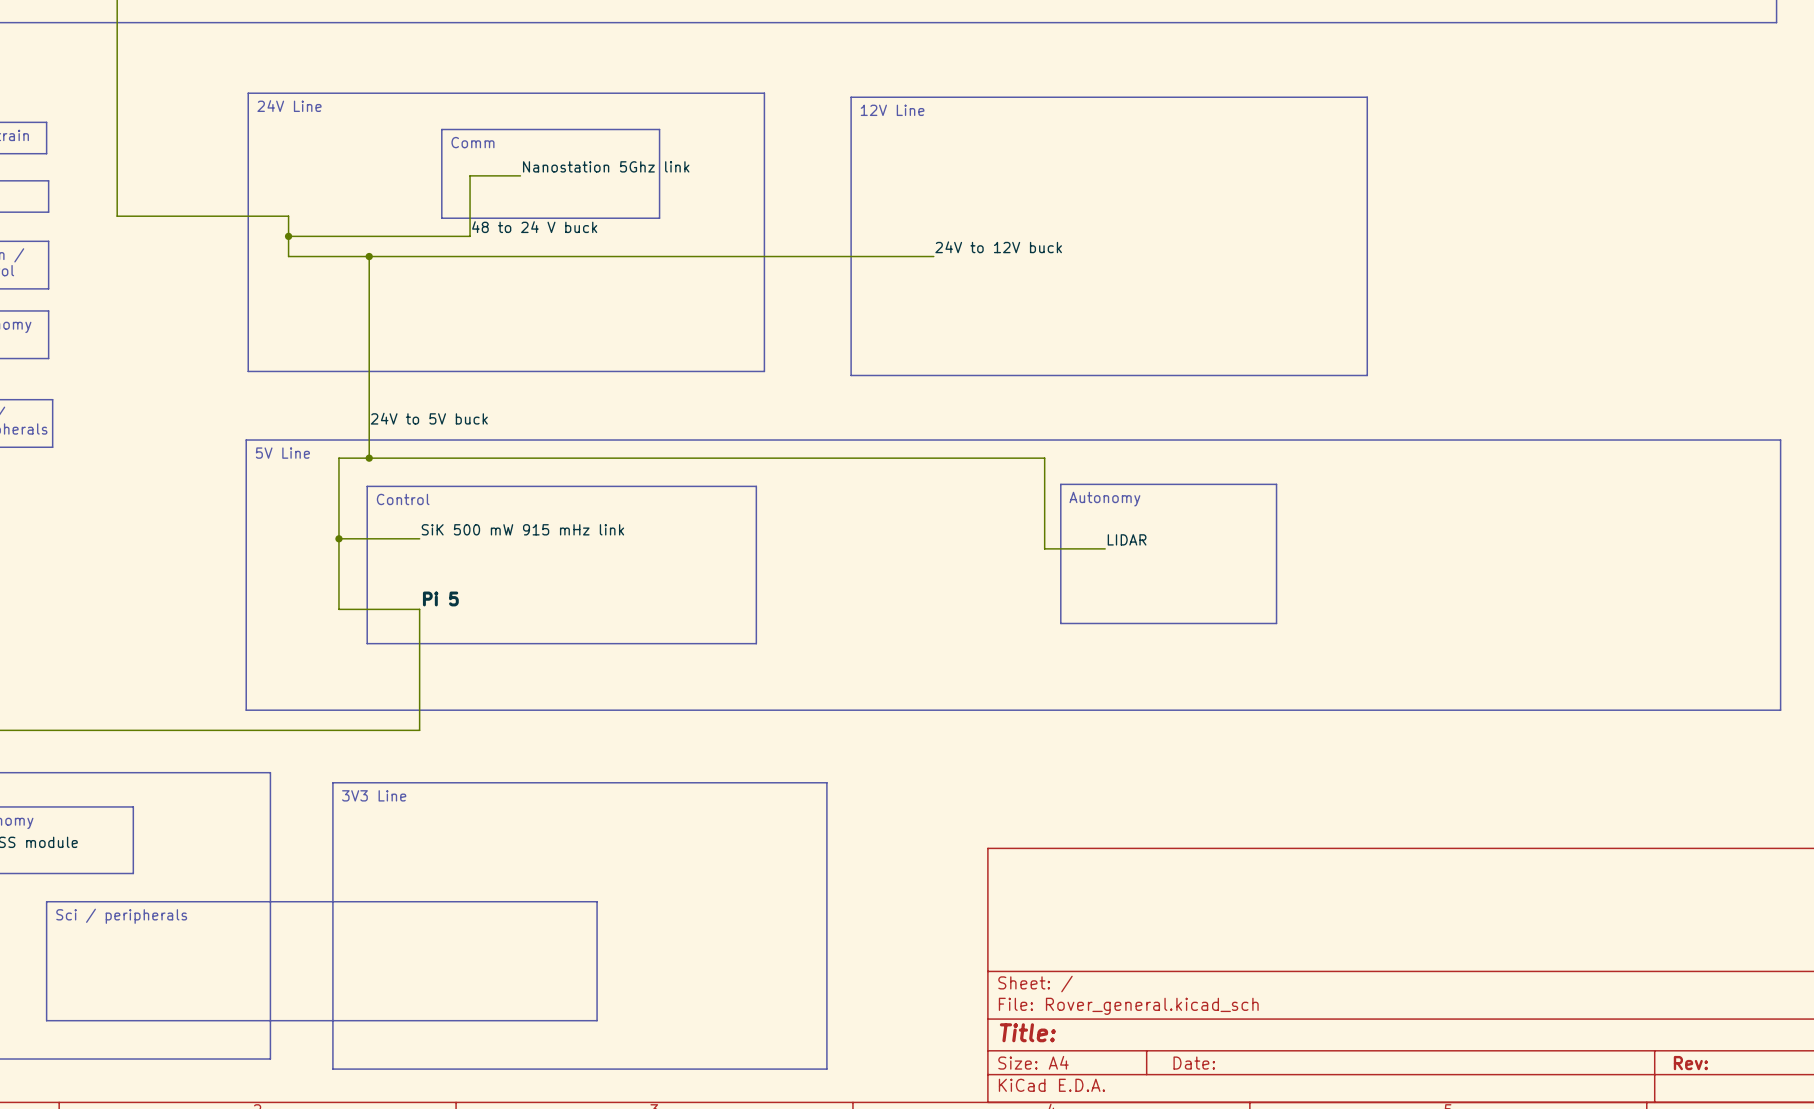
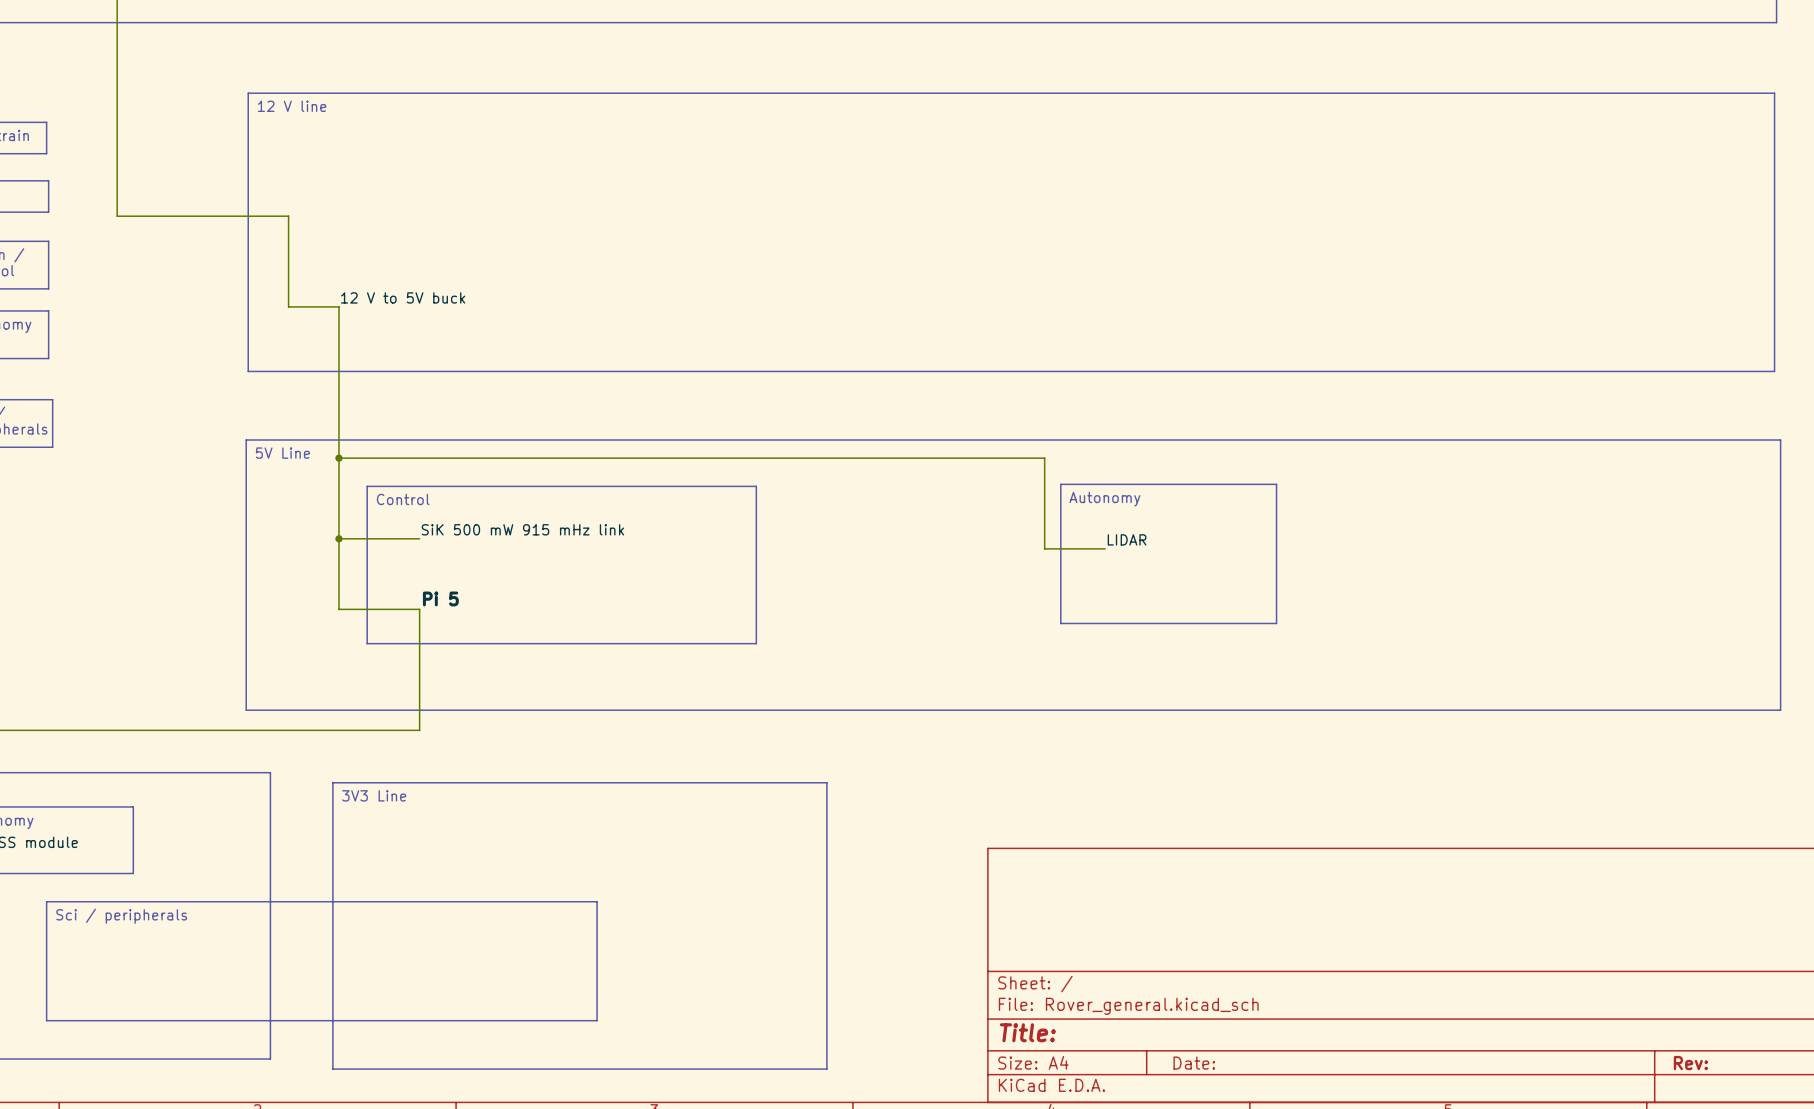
line: (764, 93) (764, 371) -> (764, 93) (1774, 93) (1774, 371) (764, 371)
line: (851, 97) (1367, 97) (1367, 375) (851, 375) (851, 97) -> none
text: 24V Line (289, 106) -> 12 V line (292, 106)
text: 12V Line (892, 110) -> none
line: (441, 129) (659, 129) (659, 218) (441, 218) (441, 129) -> none
text: Comm (472, 142) -> none
label: Nanostation 5Ghz link (606, 166) -> none
wire: (520, 175) (470, 175) (470, 236) (288, 236) -> none
label: 48 to 24 V buck (534, 227) -> none
junction: (288, 236) -> none
label: 24V to 12V buck (998, 247) -> none
wire: (288, 256) (933, 256) -> (288, 256) (288, 306) (338, 306) (338, 458)
wire: (369, 256) (369, 458) -> none
junction: (369, 256) -> none
label: none -> 12 V to 5V buck (403, 297)
label: 24V to 5V buck (429, 418) -> none
junction position: (369, 458) -> (338, 458)

